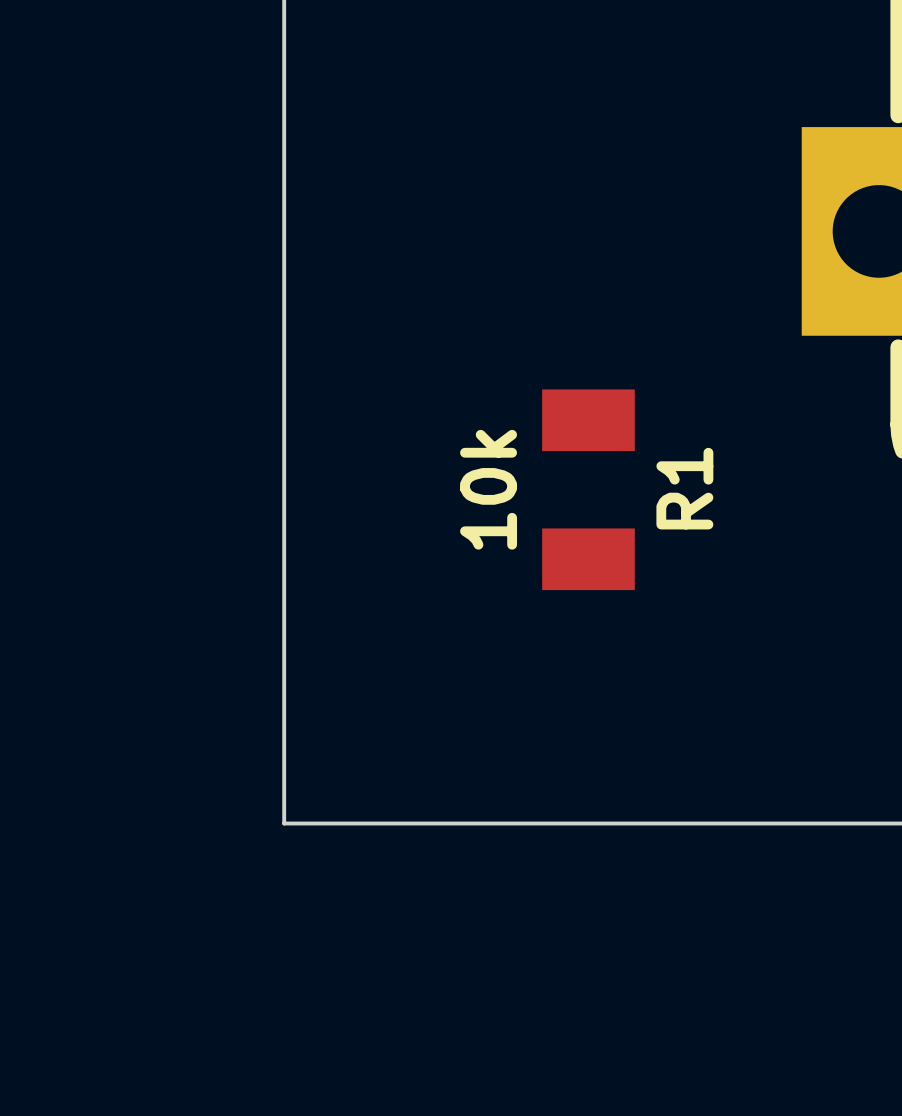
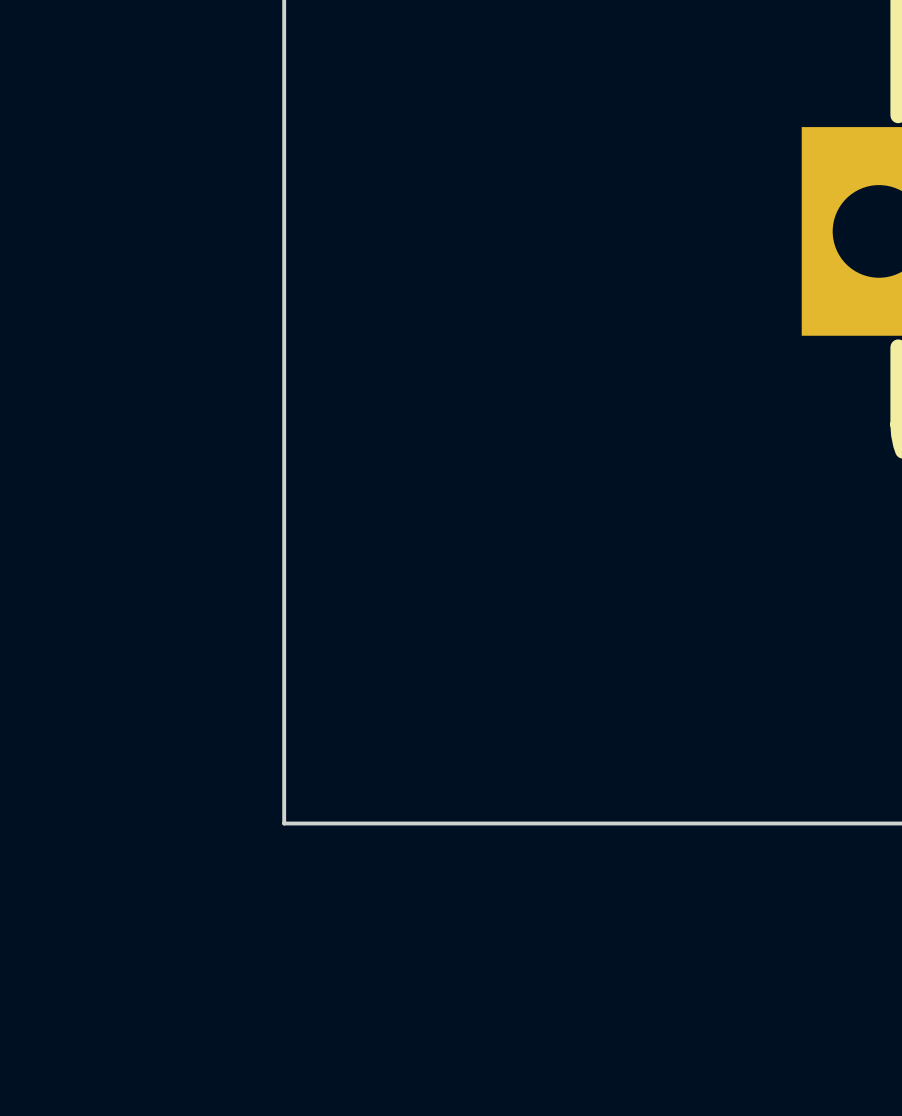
R1: 10k (588, 489) -> none

